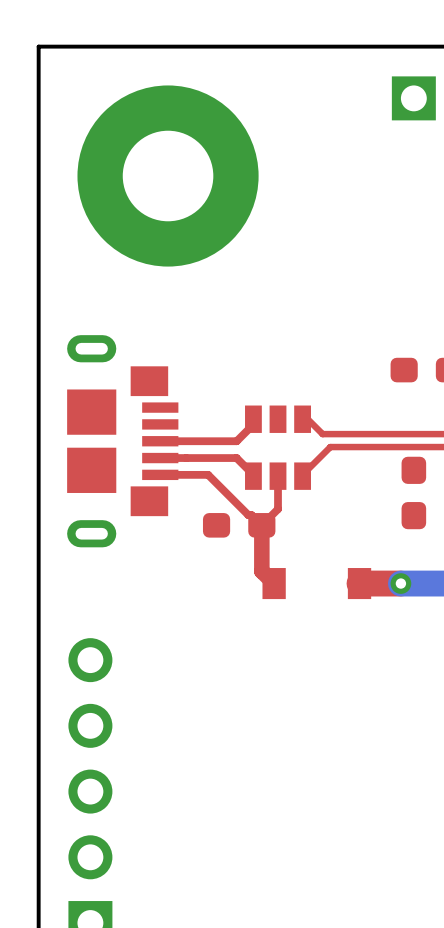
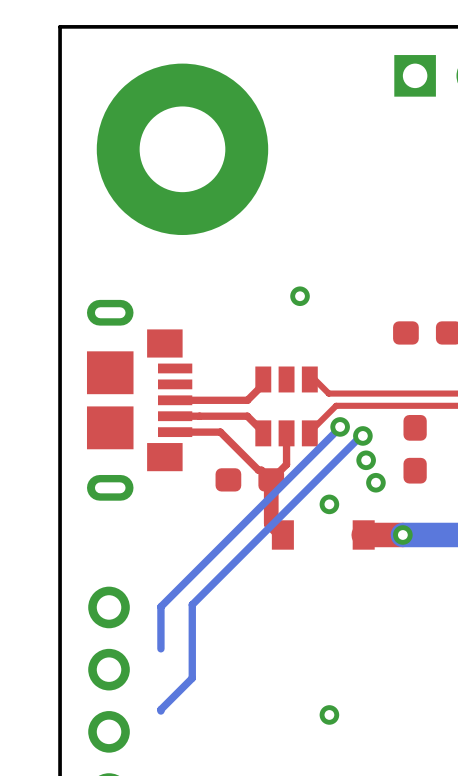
via: none -> (300, 296)
bottom track: none -> (340, 426) (160, 606) (160, 648)
via: none -> (340, 426)
bottom track: none -> (362, 435) (192, 604) (192, 678) (160, 711)
via: none -> (362, 435)
via: none -> (366, 460)
via: none -> (375, 482)
via: none -> (329, 504)
via: none -> (329, 714)

